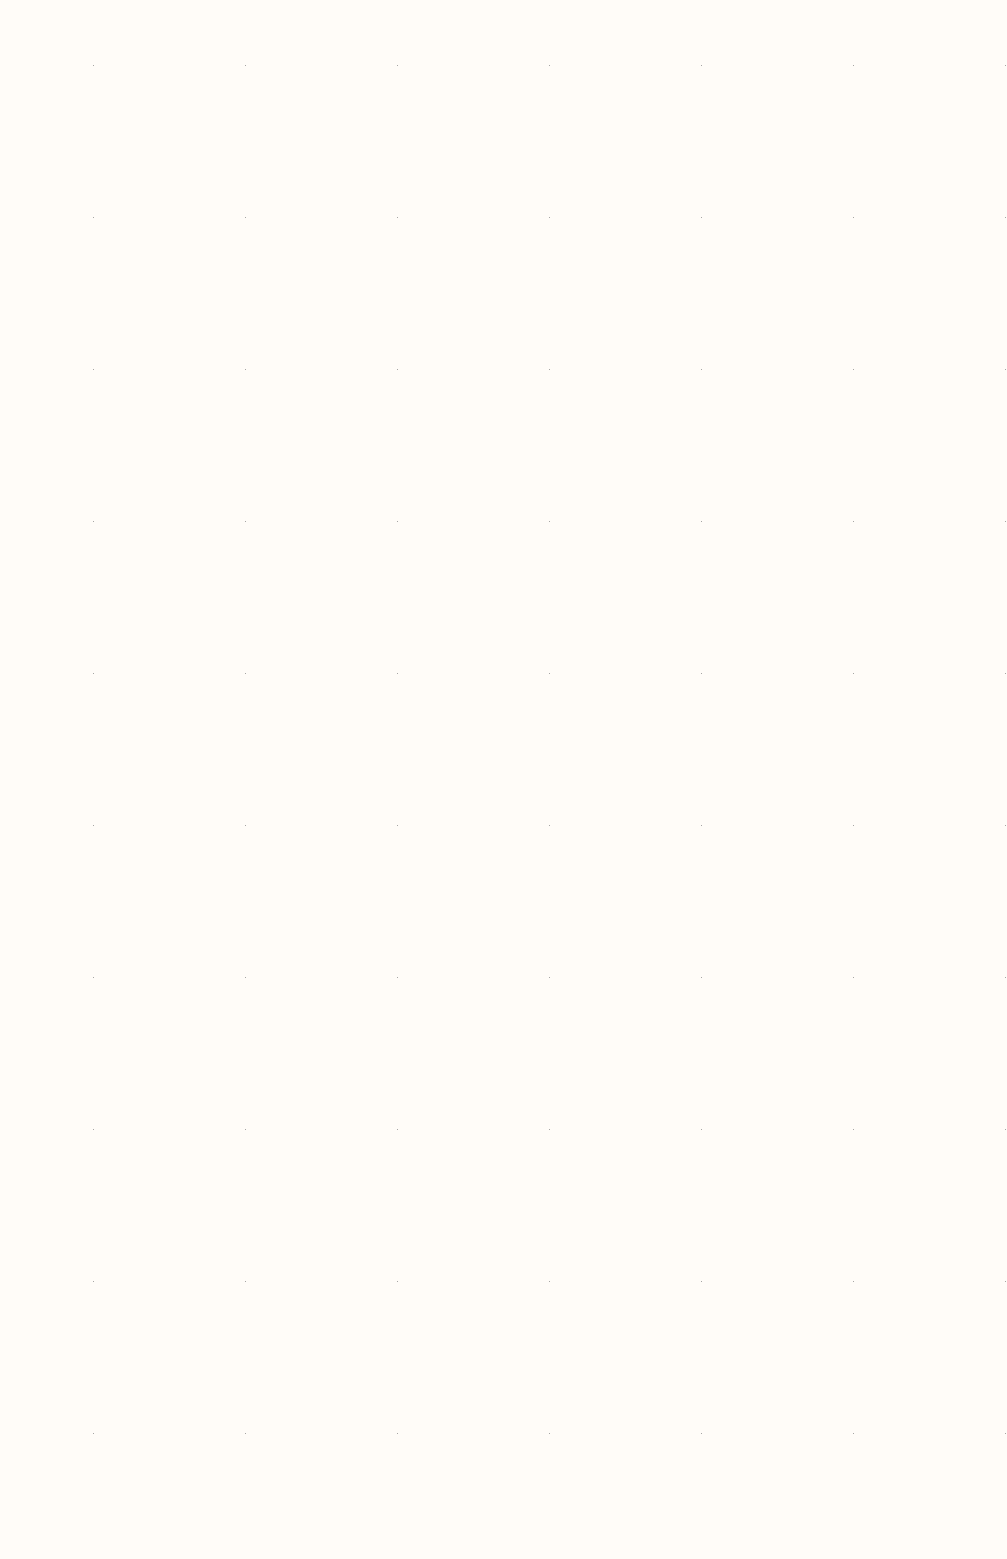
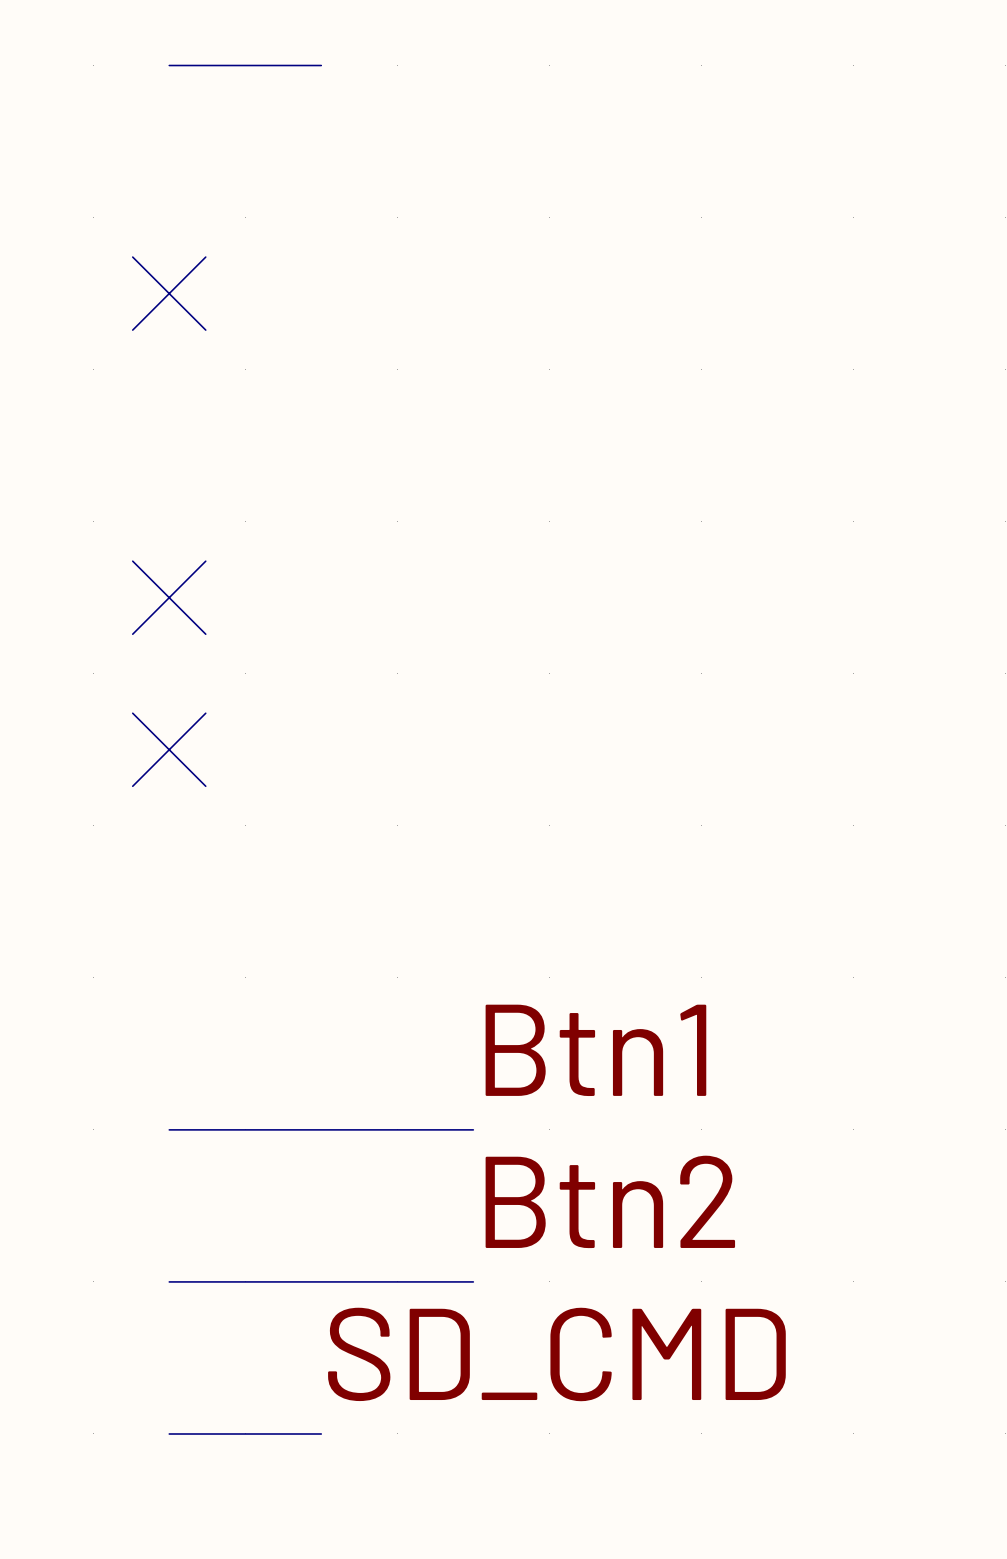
wire: none -> (169, 65) (321, 65)
no-connect mark: none -> (169, 293)
no-connect mark: none -> (169, 597)
no-connect mark: none -> (169, 749)
label: none -> Btn1 (595, 1050)
wire: none -> (169, 1129) (473, 1129)
label: none -> Btn2 (610, 1201)
wire: none -> (169, 1281) (473, 1281)
label: none -> SD_CMD (556, 1354)
wire: none -> (169, 1433) (321, 1433)

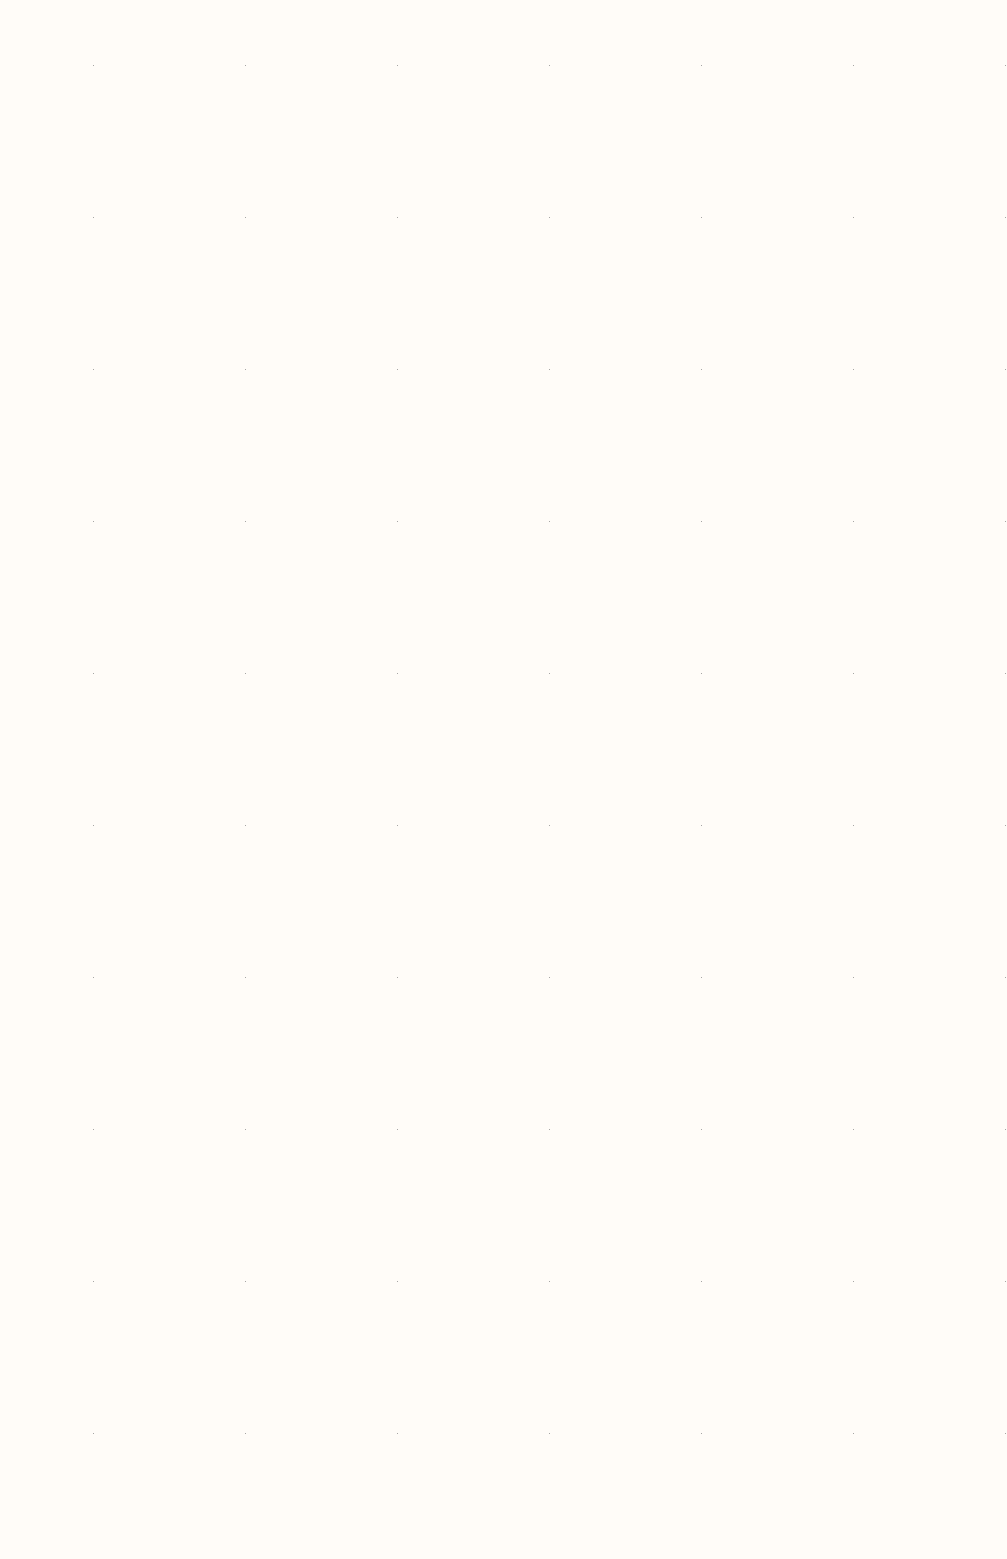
wire: (169, 65) (321, 65) -> none
no-connect mark: (169, 293) -> none
no-connect mark: (169, 597) -> none
no-connect mark: (169, 749) -> none
label: Btn1 (595, 1050) -> none
wire: (169, 1129) (473, 1129) -> none
label: Btn2 (610, 1201) -> none
wire: (169, 1281) (473, 1281) -> none
label: SD_CMD (556, 1354) -> none
wire: (169, 1433) (321, 1433) -> none

